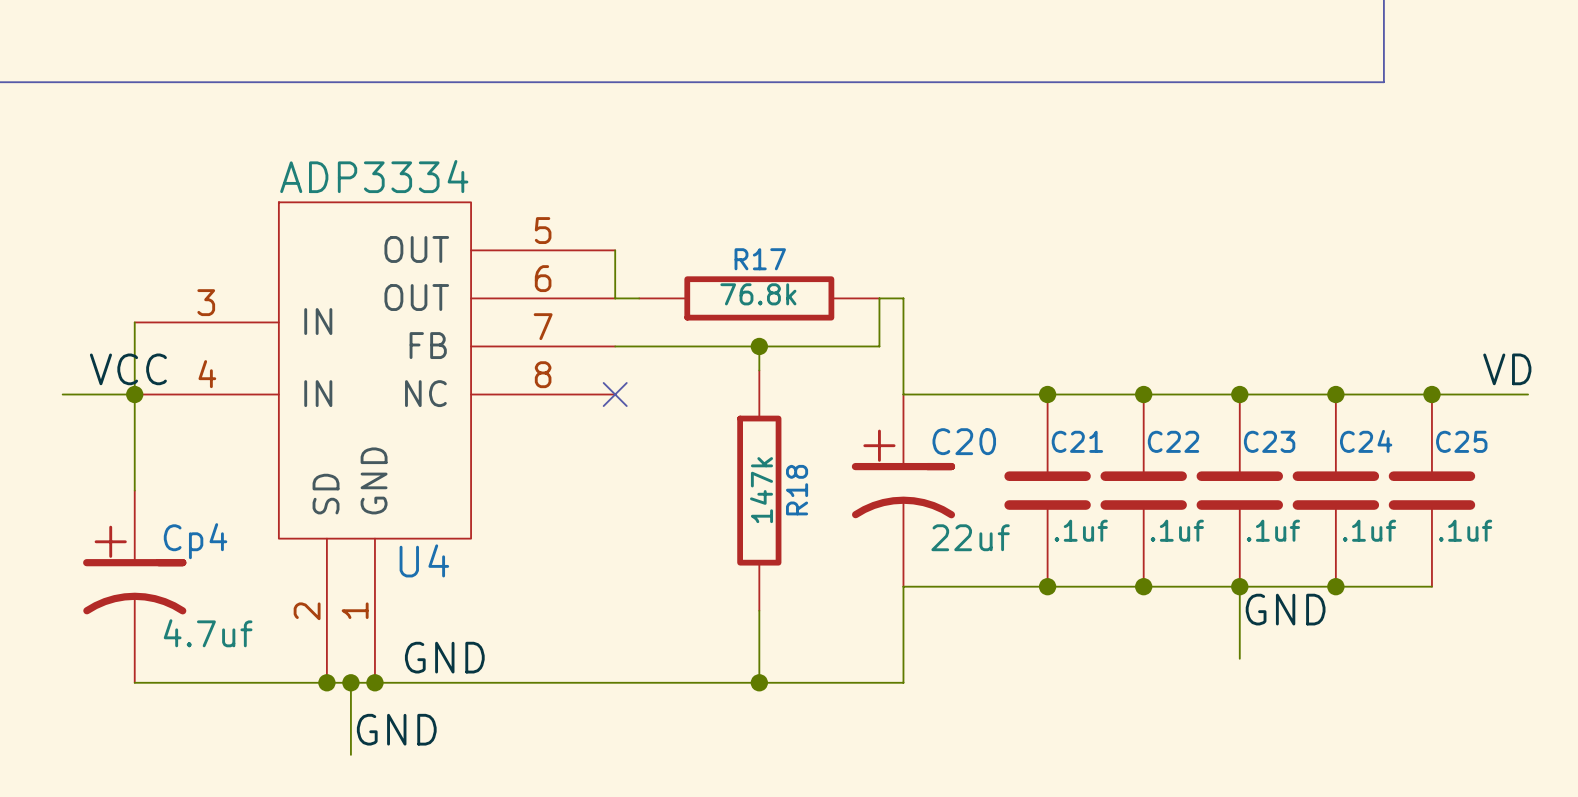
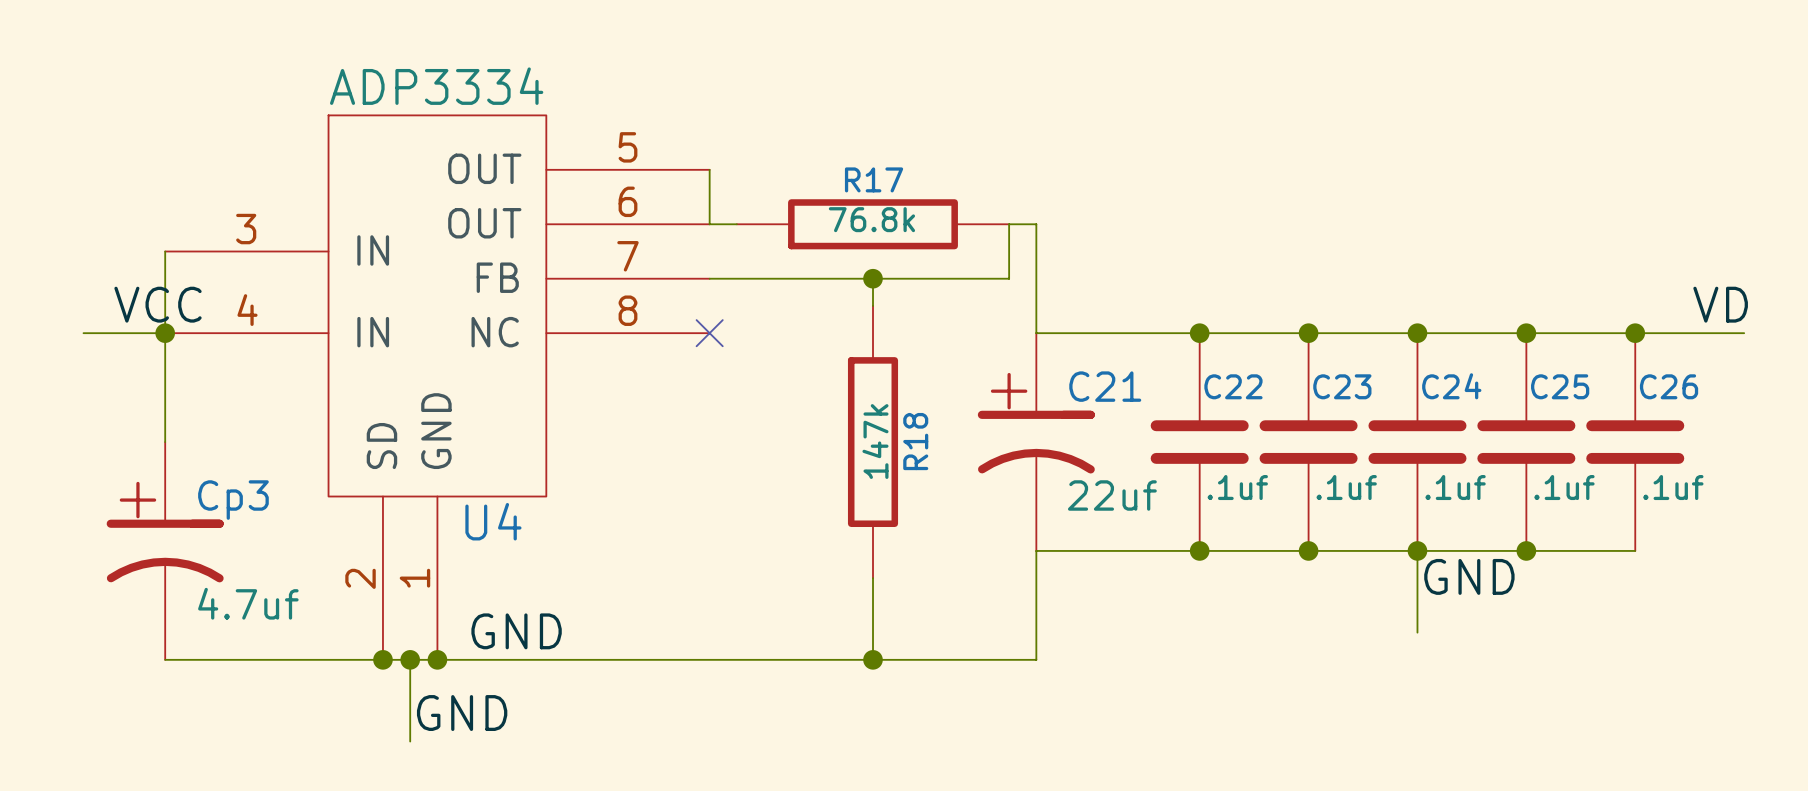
C20 name: C20 (964, 441) -> C21 (1105, 386)
C21 name: C21 (1077, 441) -> C22 (1233, 386)
C22 name: C22 (1173, 441) -> C23 (1342, 386)
C23 name: C23 (1269, 441) -> C24 (1451, 386)
C24 name: C24 (1366, 441) -> C25 (1560, 386)
C25 name: C25 (1461, 441) -> C26 (1669, 386)
Cp4 name: Cp4 (195, 541) -> Cp3 (233, 500)

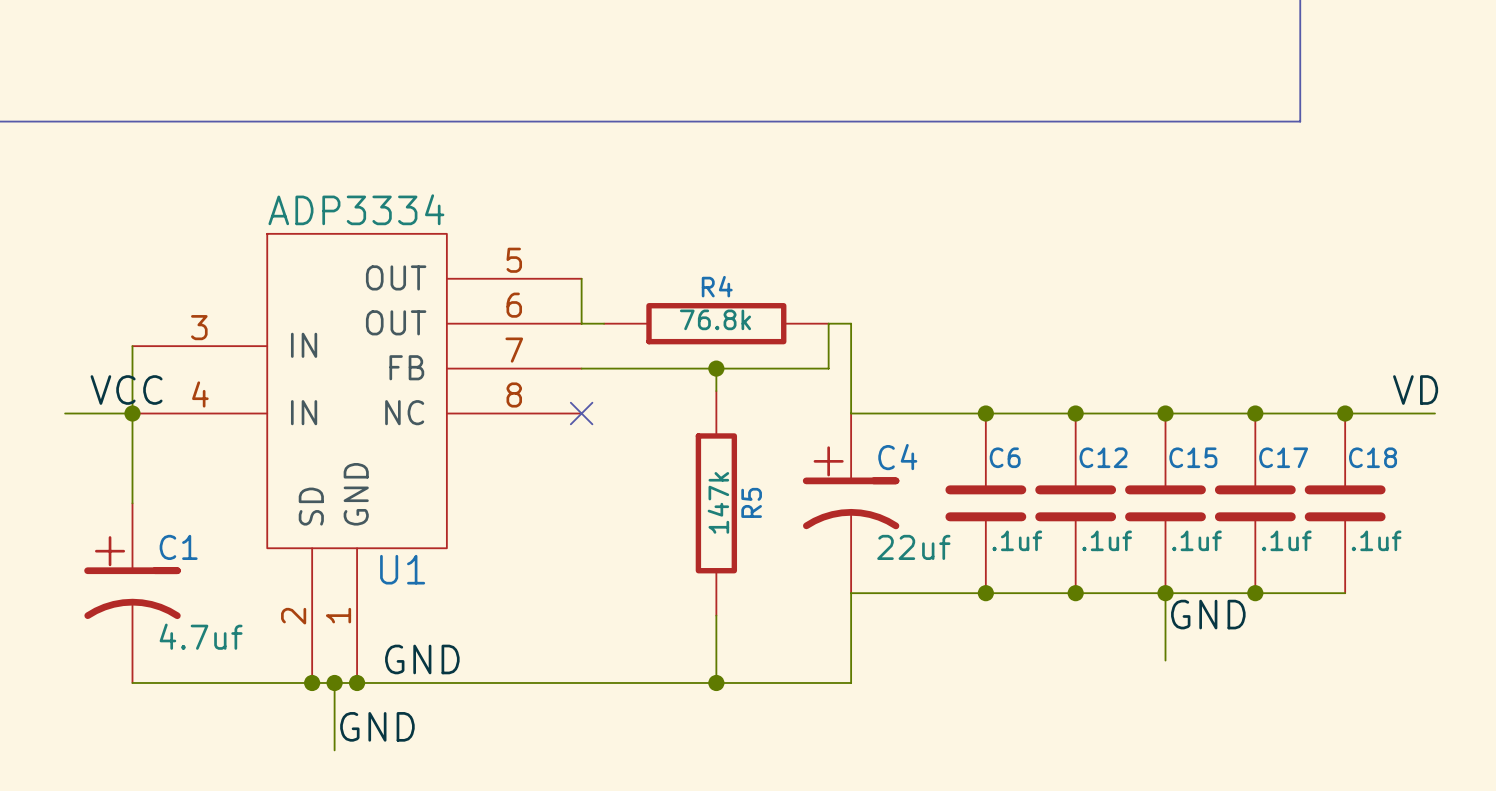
R17 name: R17 (874, 179) -> R4 (717, 286)
C21 name: C21 (1105, 386) -> C4 (897, 457)
C22 name: C22 (1233, 386) -> C6 (1005, 457)
C23 name: C23 (1342, 386) -> C12 (1103, 457)
C24 name: C24 (1451, 386) -> C15 (1193, 457)
C25 name: C25 (1560, 386) -> C17 (1283, 457)
C26 name: C26 (1669, 386) -> C18 (1373, 457)
R18 name: R18 (915, 441) -> R5 (751, 502)
Cp3 name: Cp3 (233, 500) -> C1 (178, 547)
U4 name: U4 (493, 521) -> U1 (402, 569)

